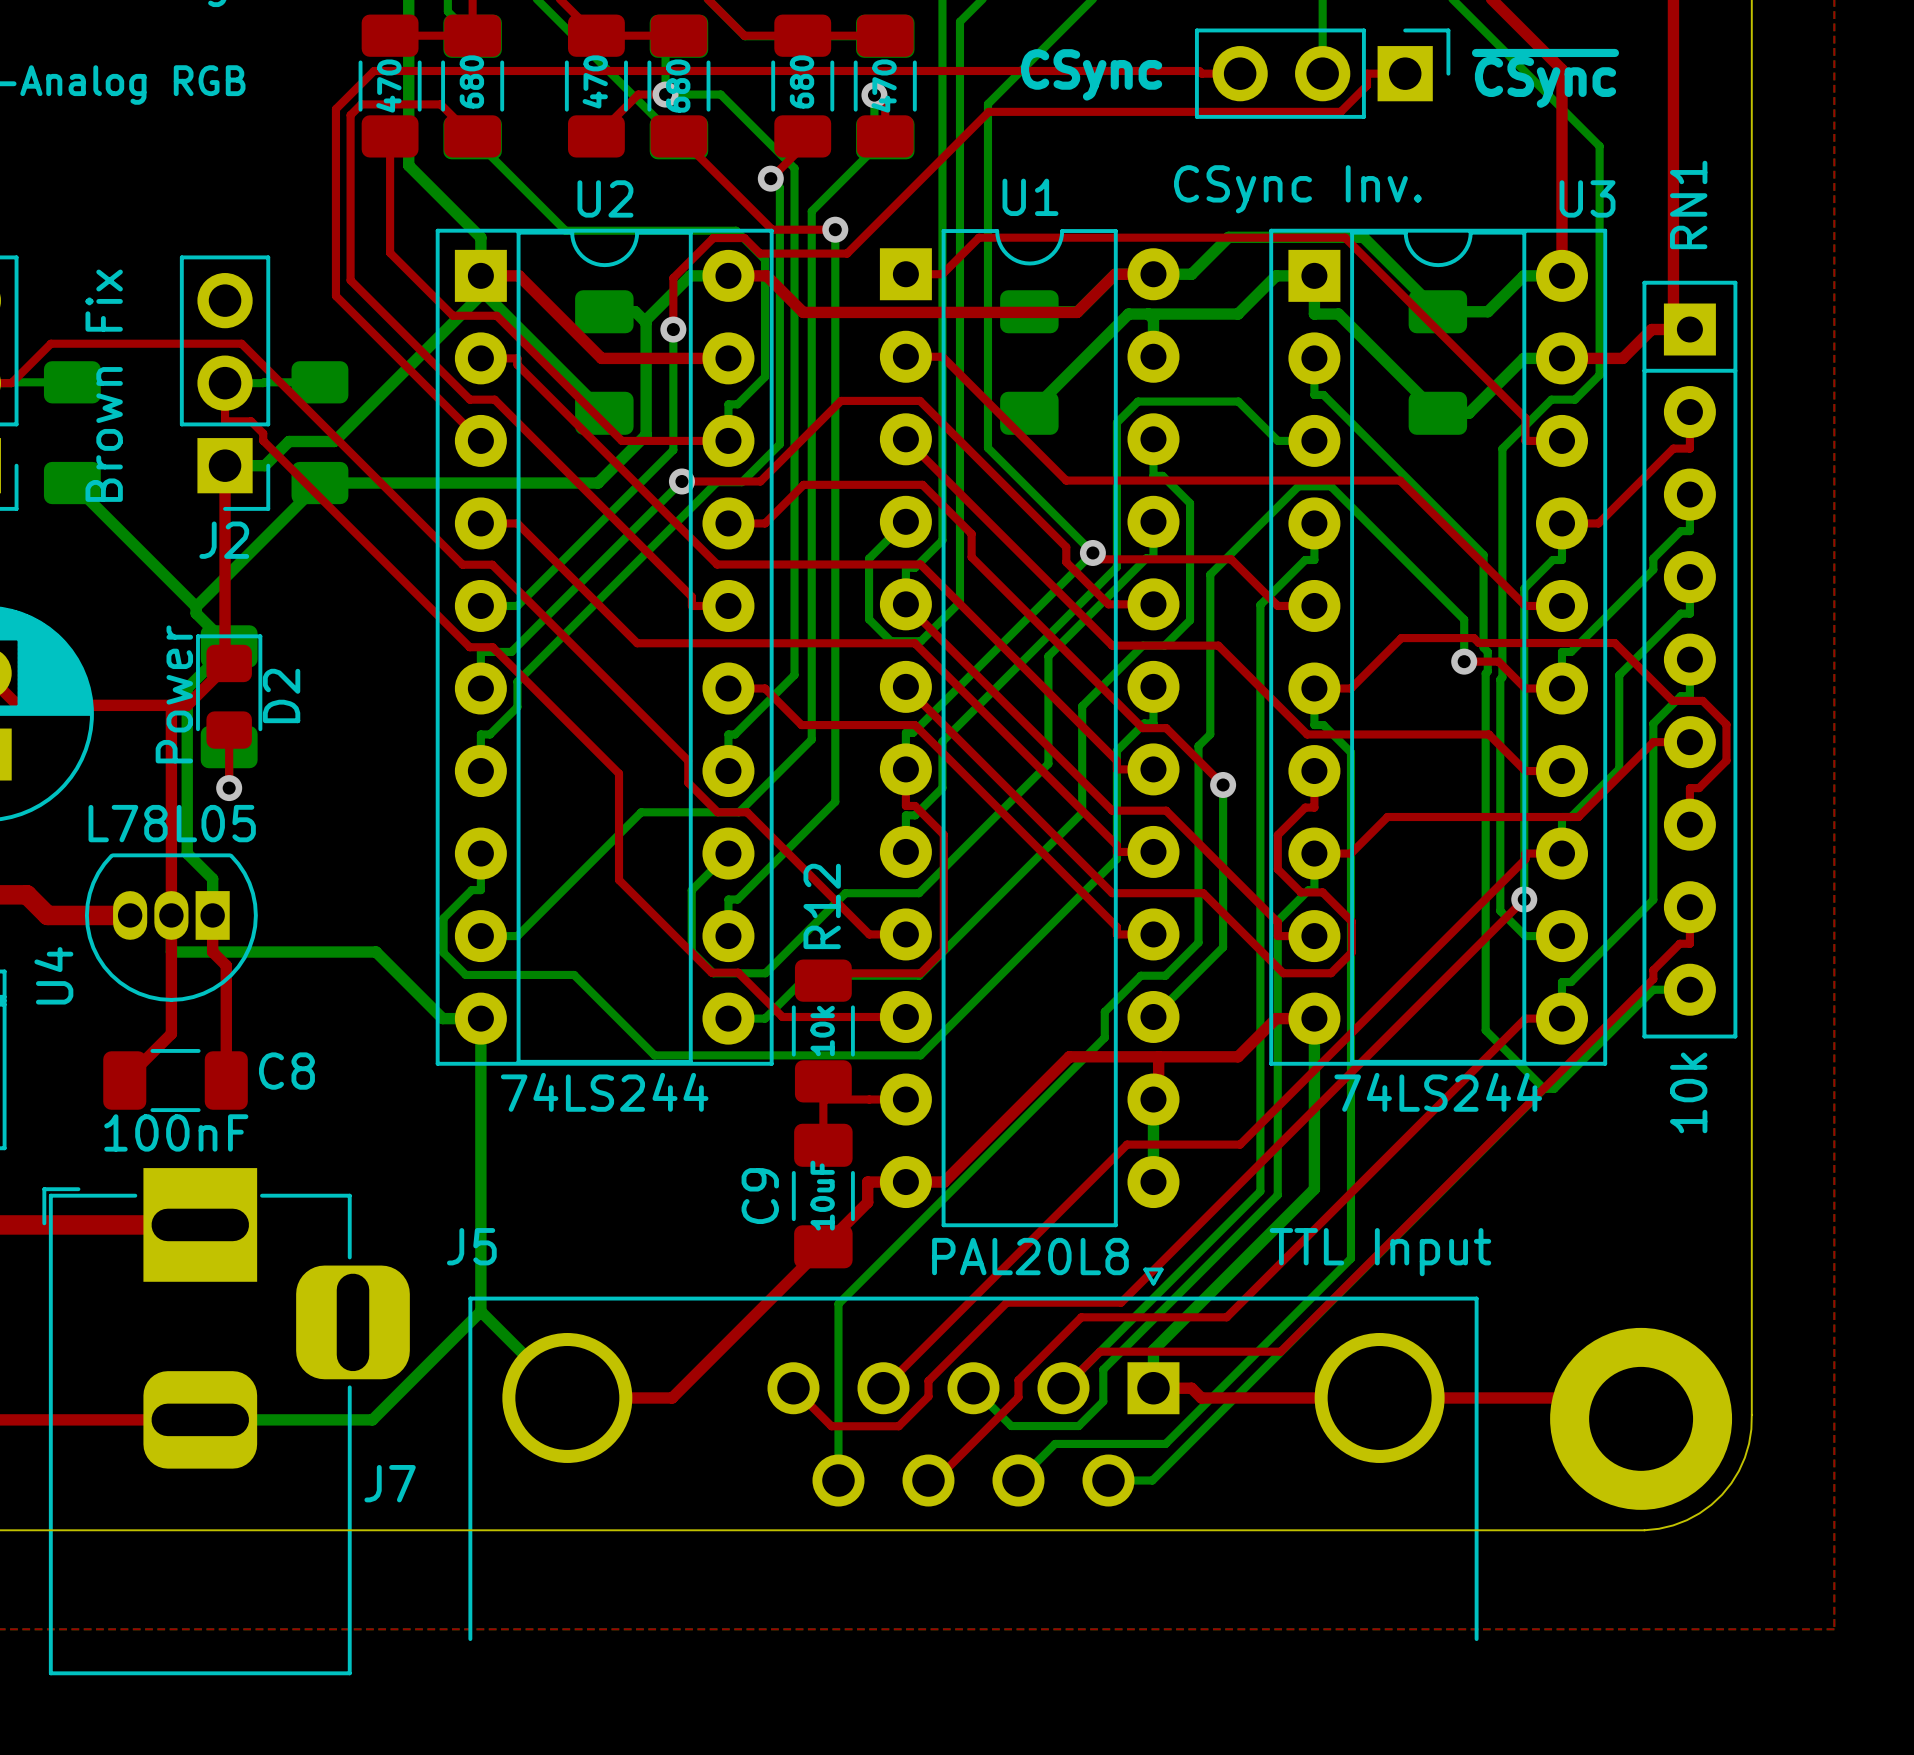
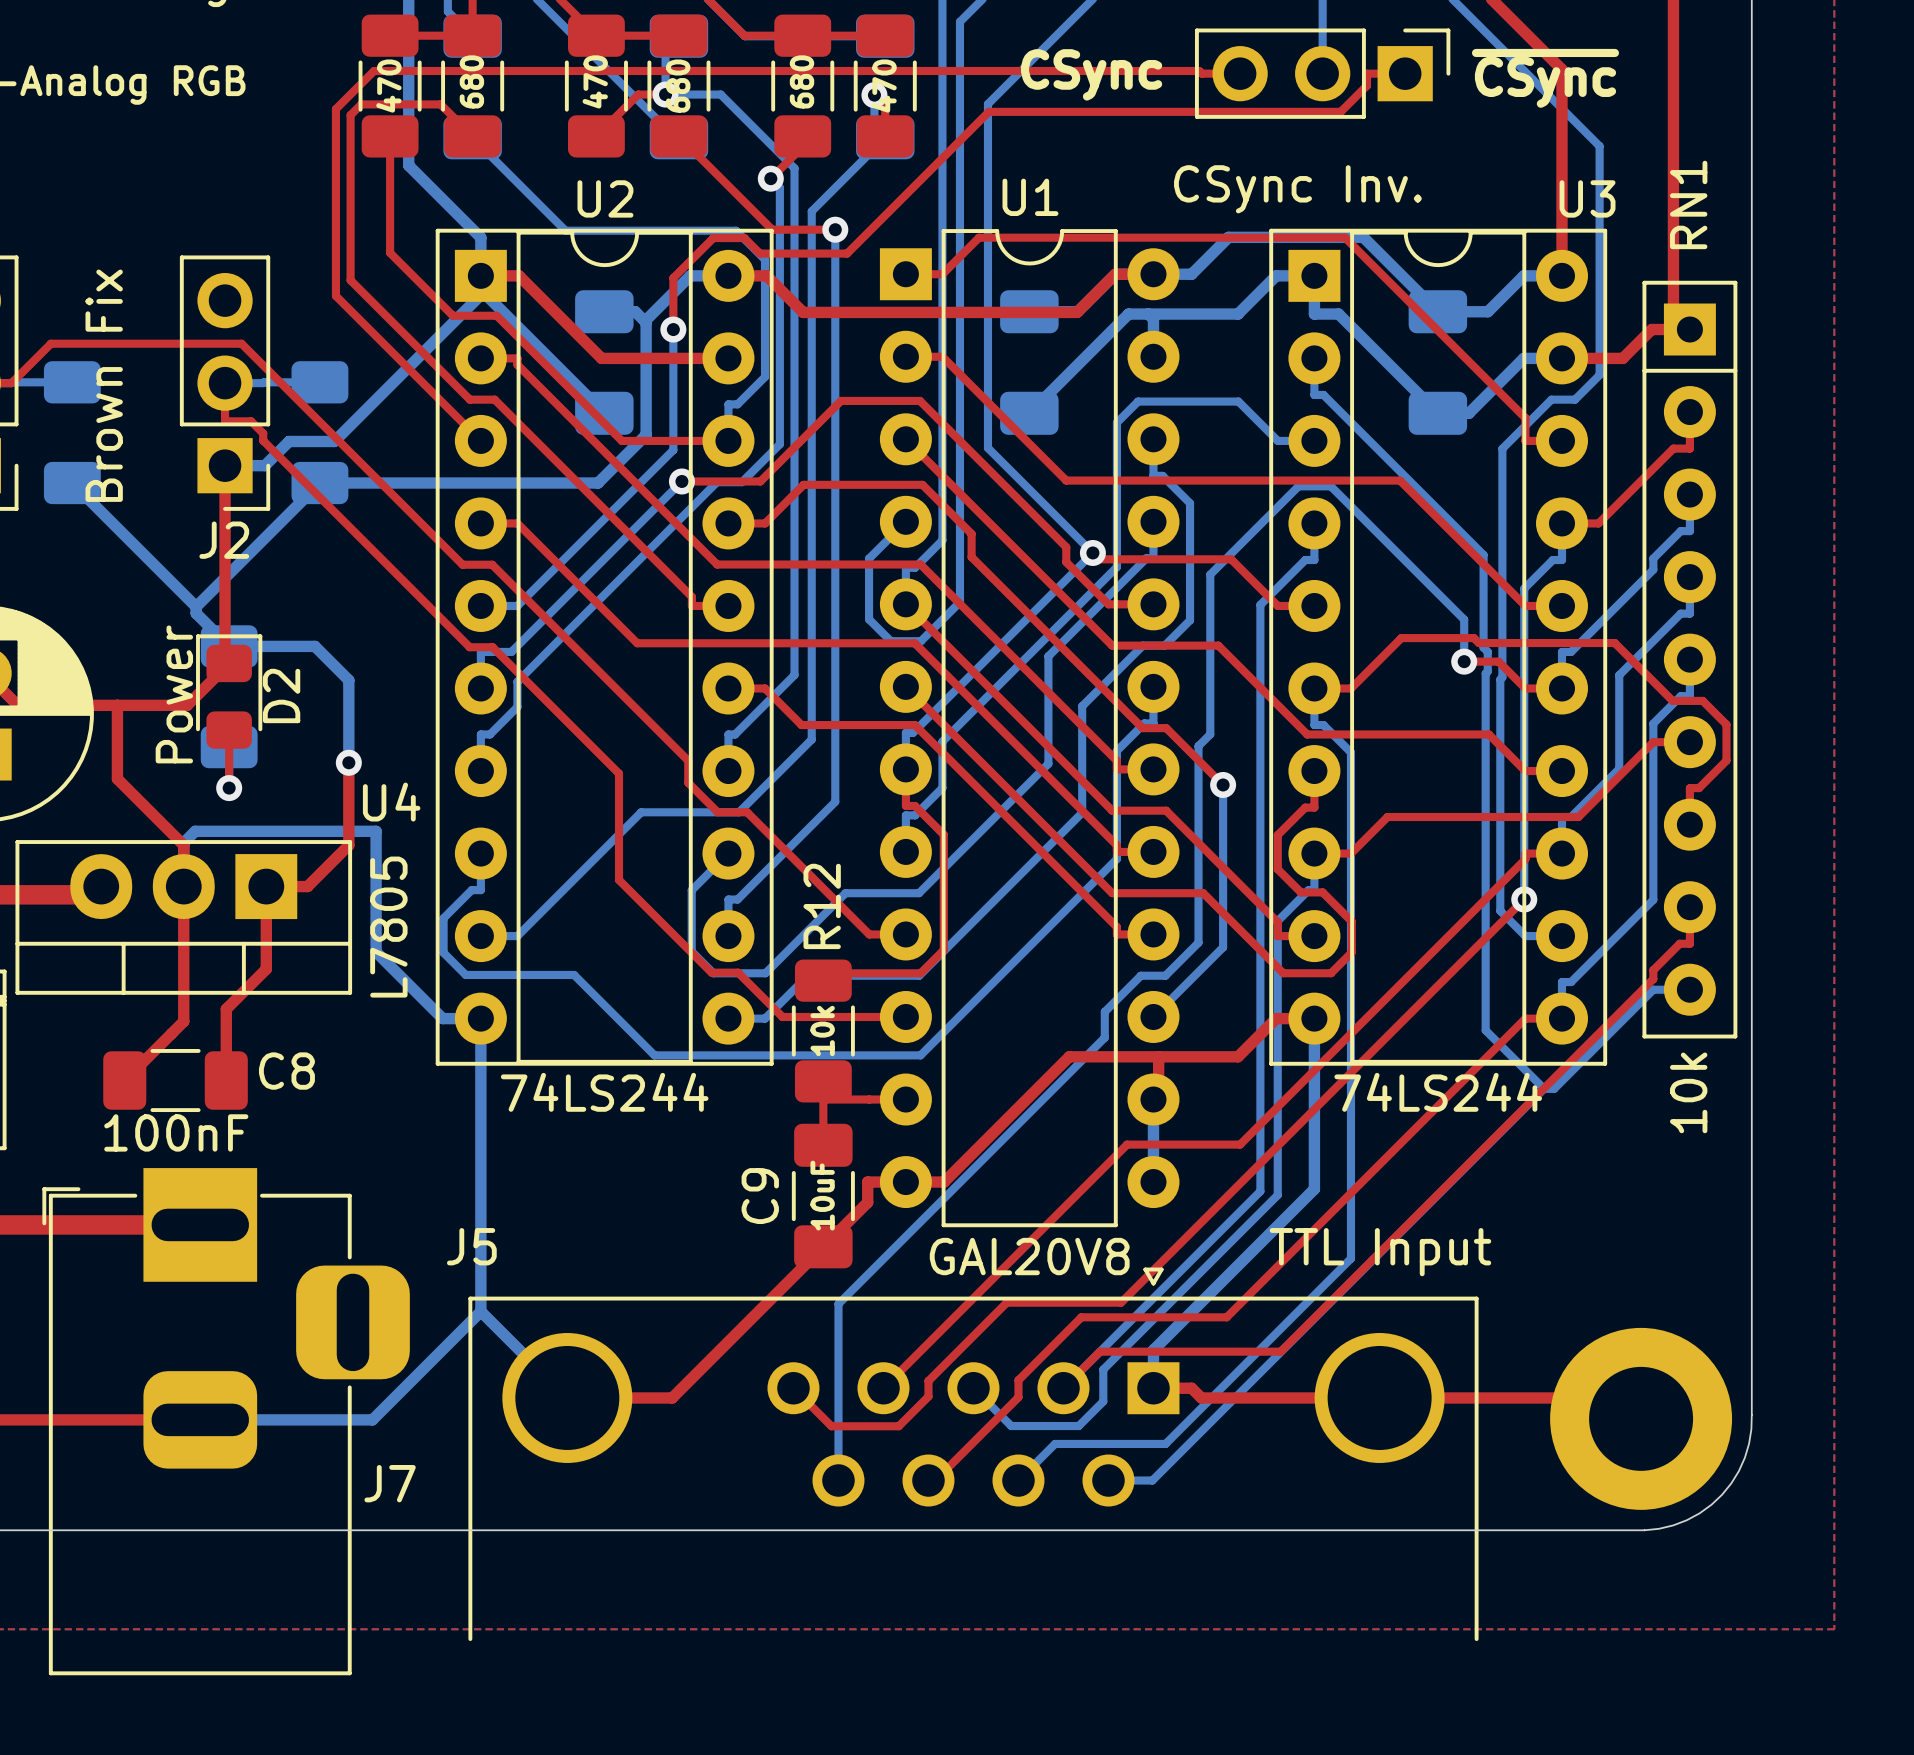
bottom track: (229, 646) (187, 688) (187, 853) (212, 878) (212, 915) -> (229, 646) (314, 646) (348, 680) (348, 762)
top track: (171, 705) (171, 1033) -> (117, 705) (117, 778) (183, 845) (183, 1021) (171, 1033)
via: none -> (348, 762)
U4 value: L78L05 (172, 823) -> L7805 (388, 927)
U4 footprint: [84, 853, 258, 1002] -> [15, 840, 353, 995]
top track: (26, 894) (47, 915) (130, 915) -> (26, 894) (93, 894) (101, 886)
bottom track: (171, 915) (171, 952) (376, 952) -> (183, 886) (183, 842) (195, 831) (376, 831) (376, 952)
top track: (212, 915) (212, 952) (226, 965) (226, 1009) -> (348, 762) (348, 845) (307, 886) (266, 886) (266, 969) (226, 1009)
U4 name position: U4 (53, 975) -> U4 (391, 802)
U1 value: PAL20L8 (1030, 1256) -> GAL20V8 (1029, 1256)

